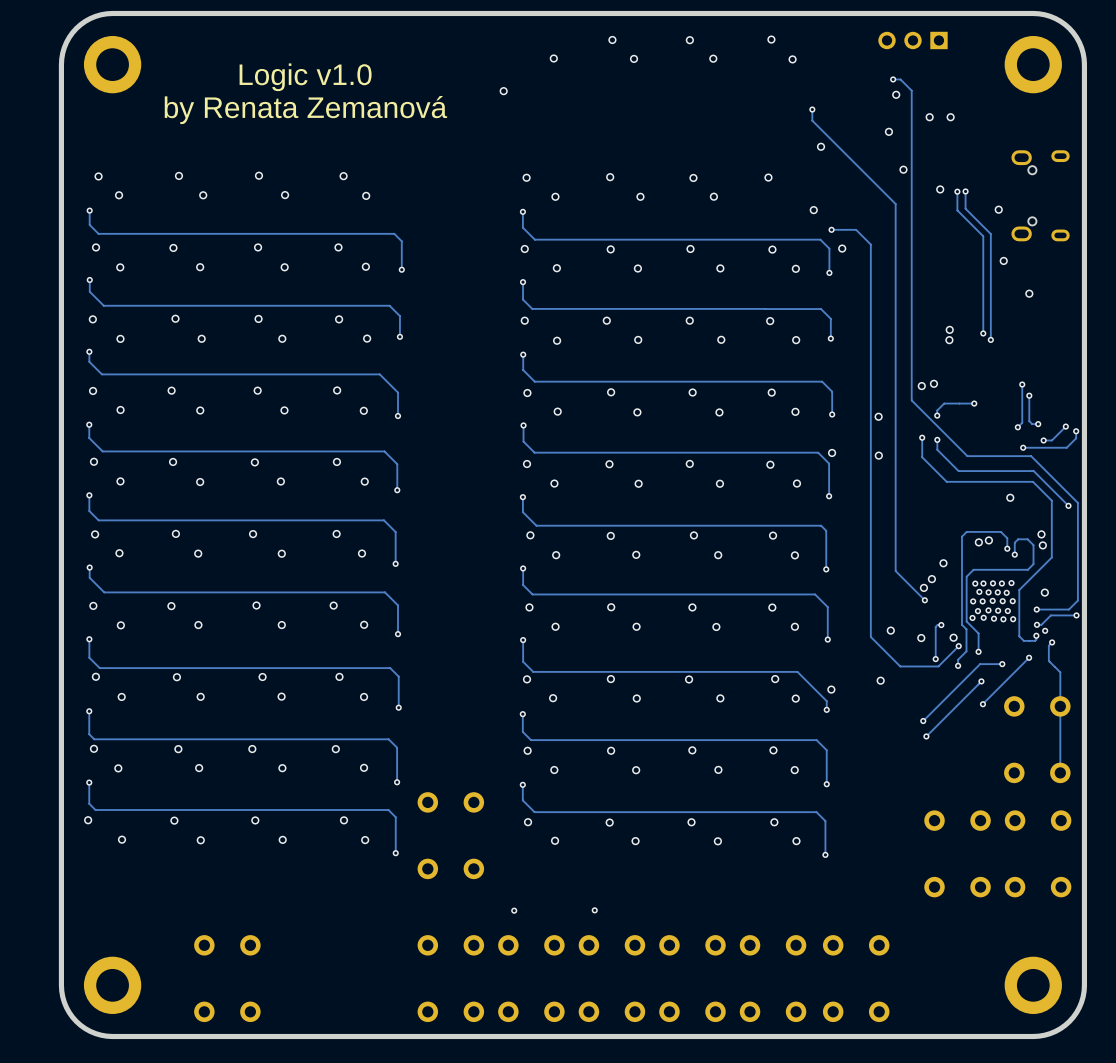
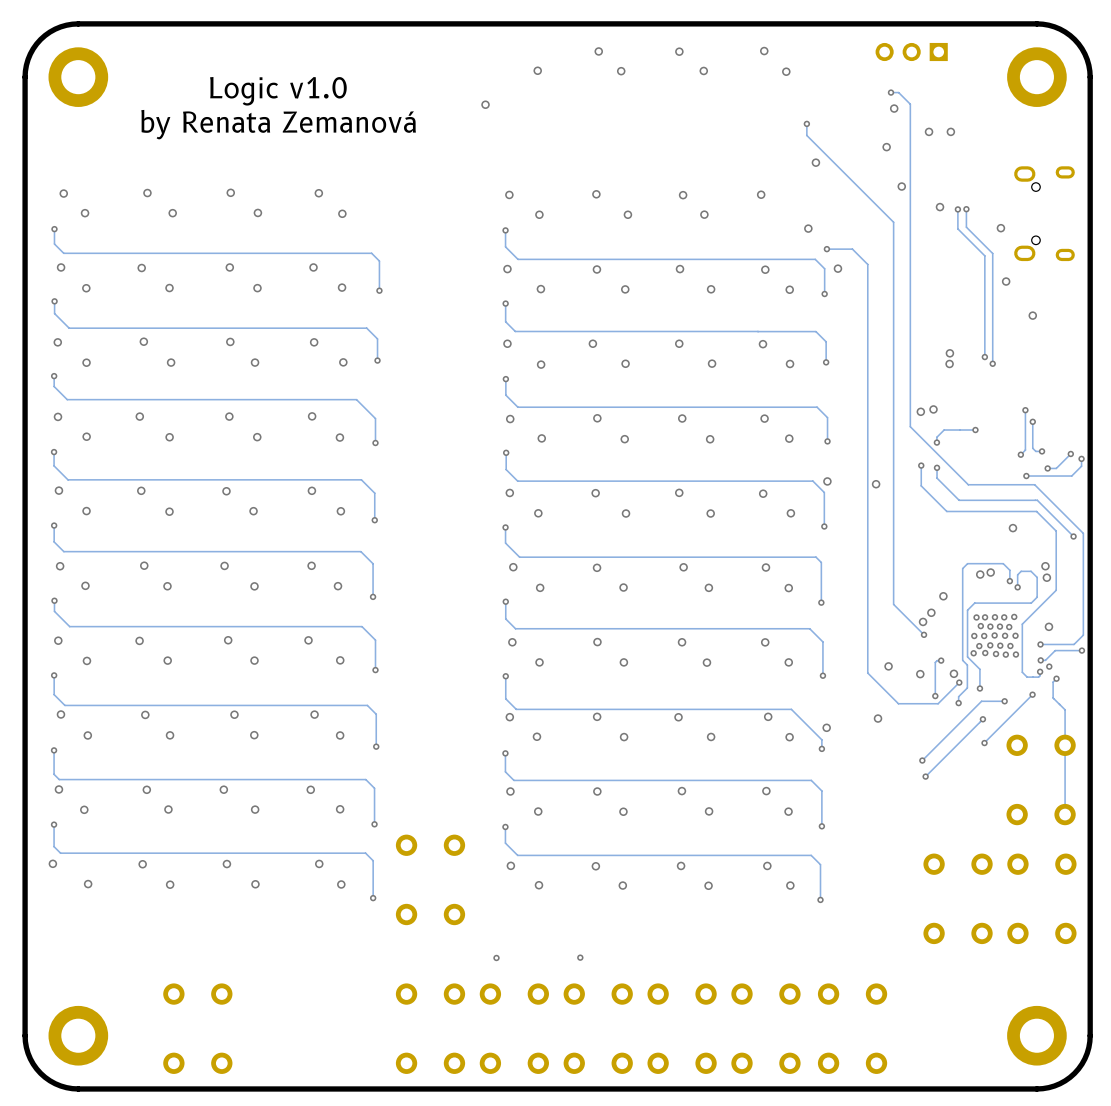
via: (878, 416) -> none

